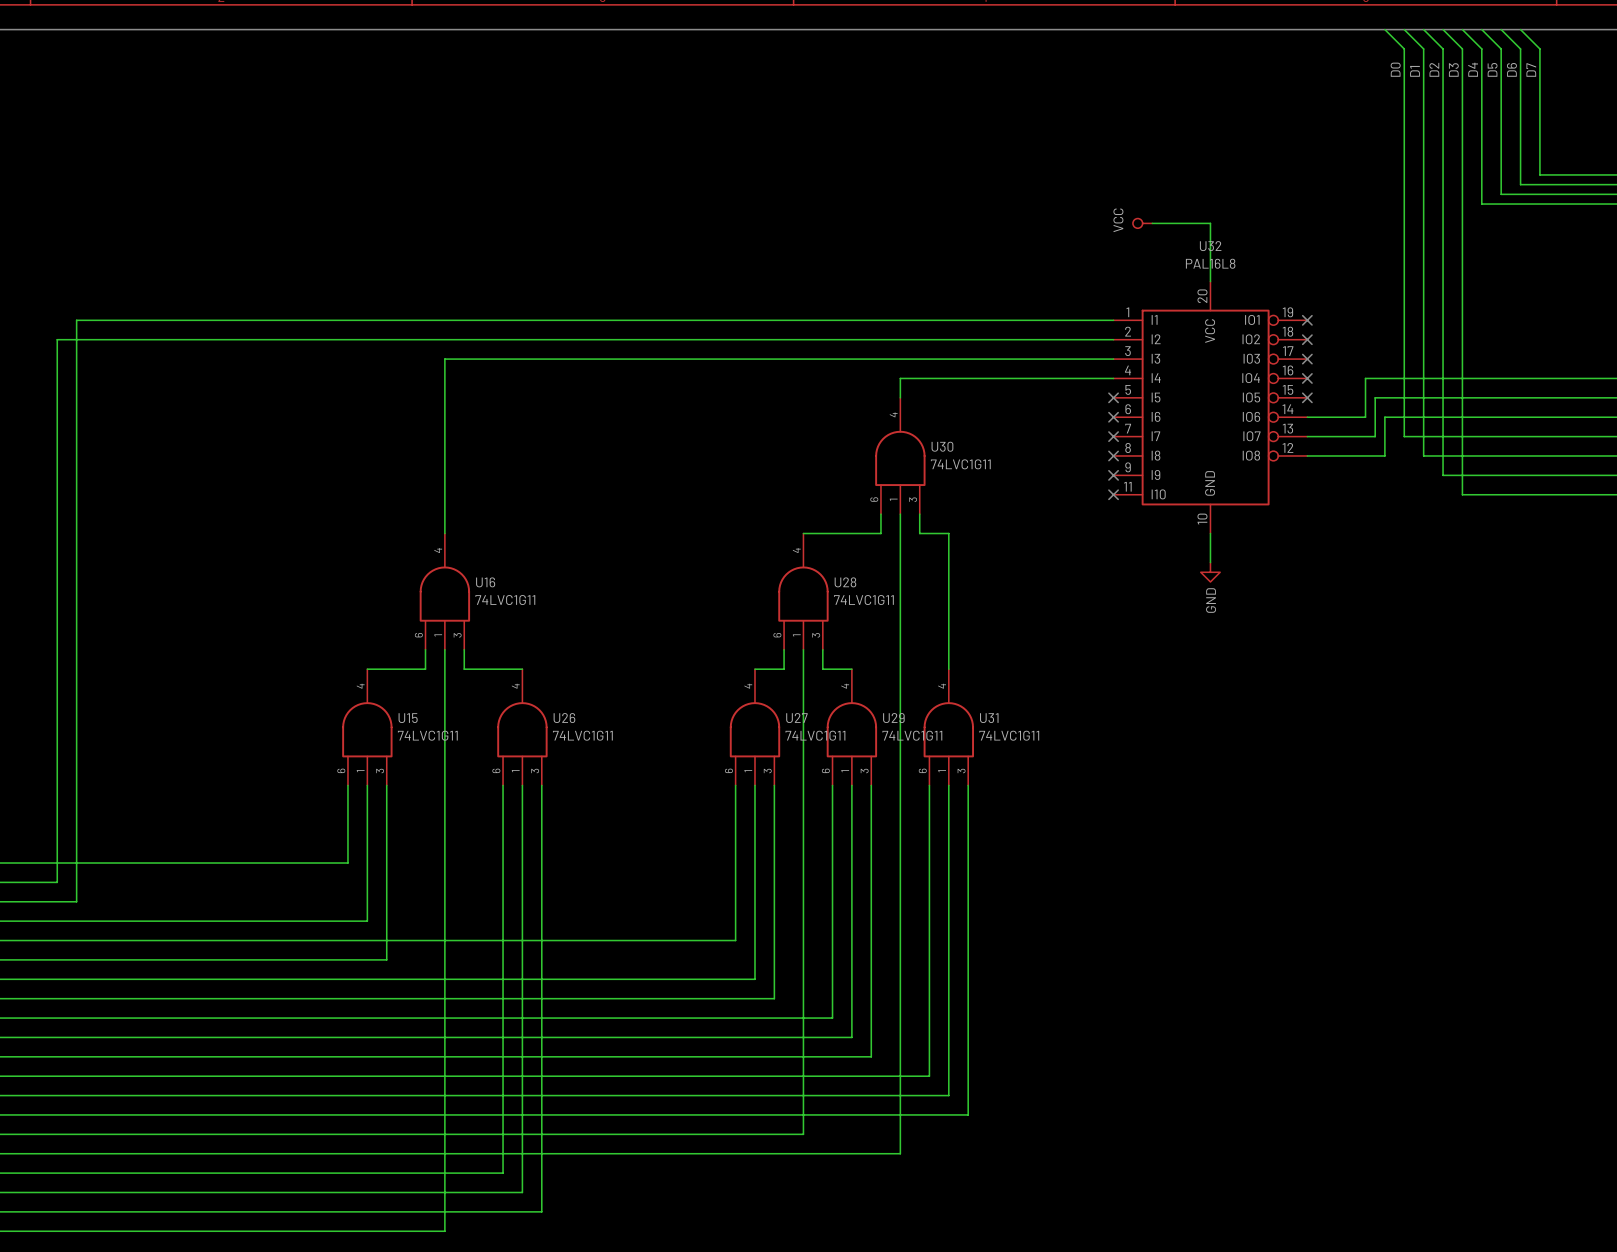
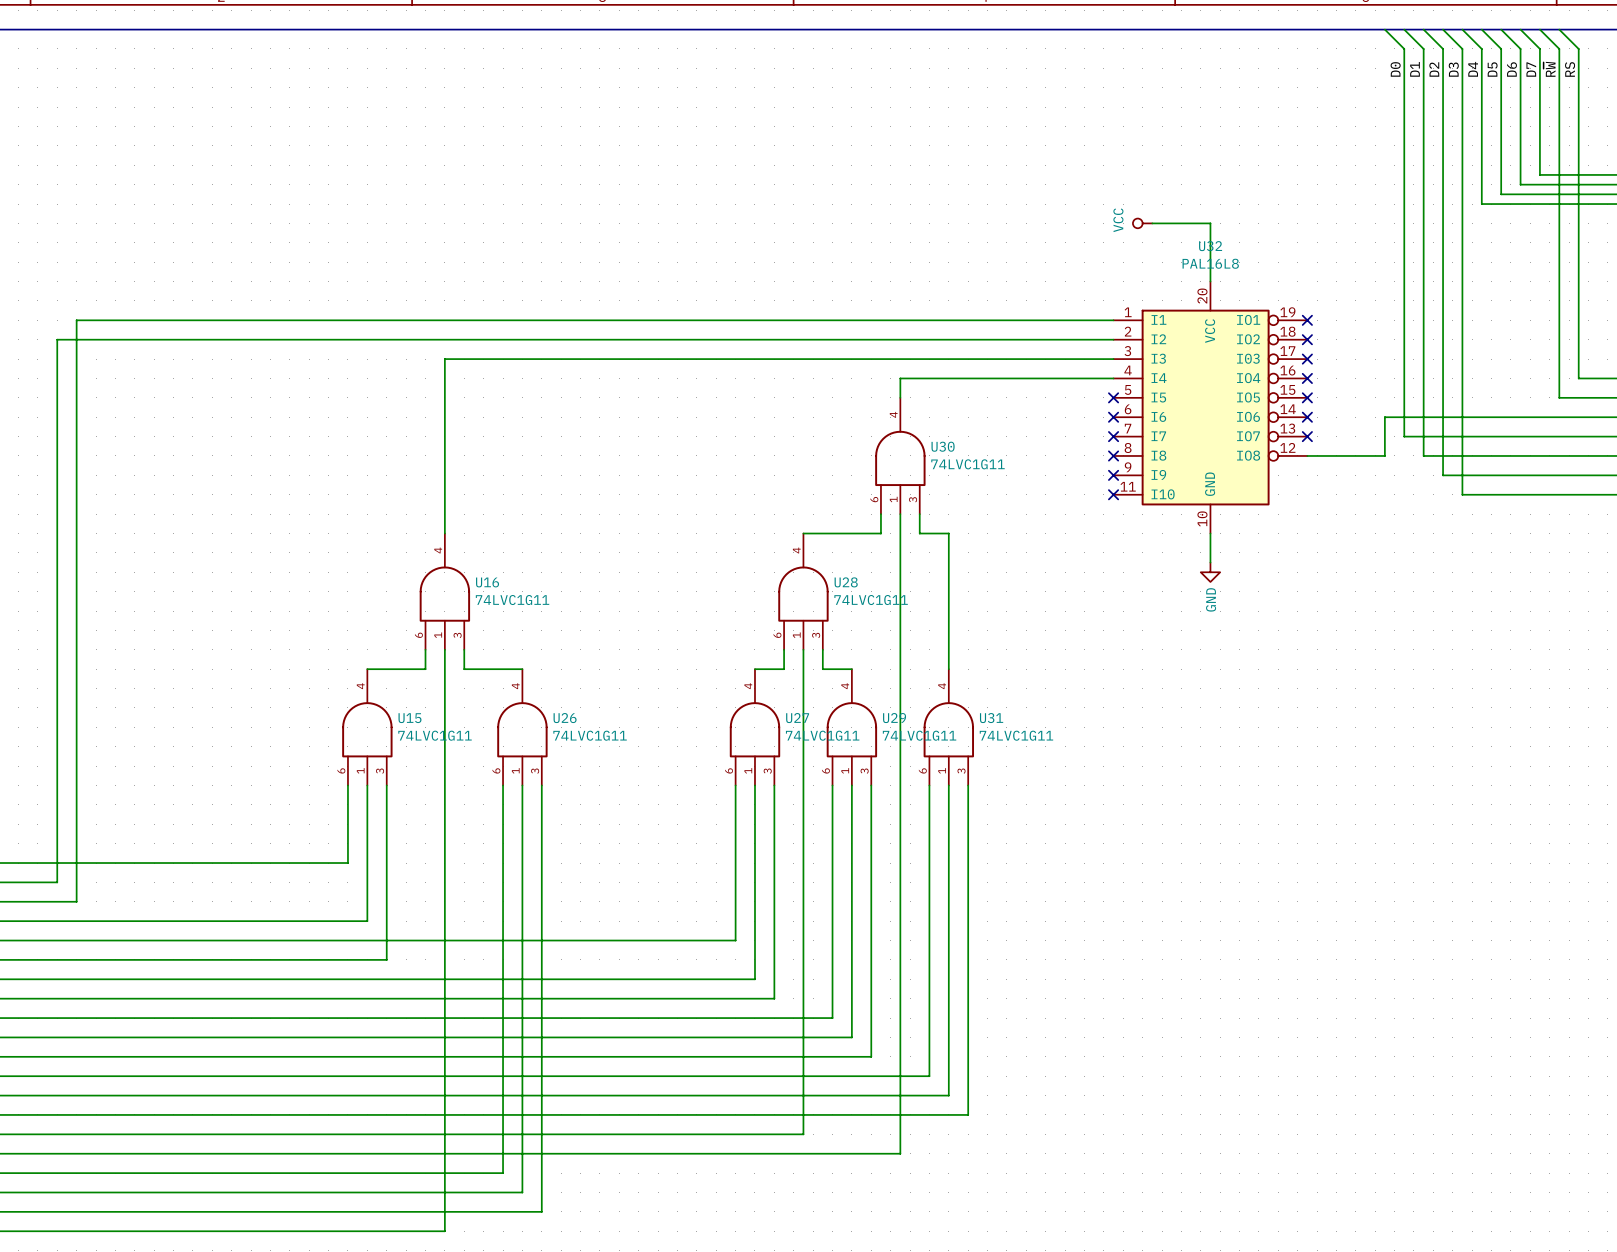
label: none -> R~{W} (1549, 69)
label: none -> RS (1570, 69)
wire: (1578, 378) (1365, 378) (1365, 417) (1307, 417) -> (1578, 378) (1578, 48) (1559, 29)
wire: (1559, 397) (1375, 397) (1375, 436) (1307, 436) -> (1559, 397) (1559, 48) (1539, 29)
no-connect mark: none -> (1307, 417)
no-connect mark: none -> (1307, 436)

